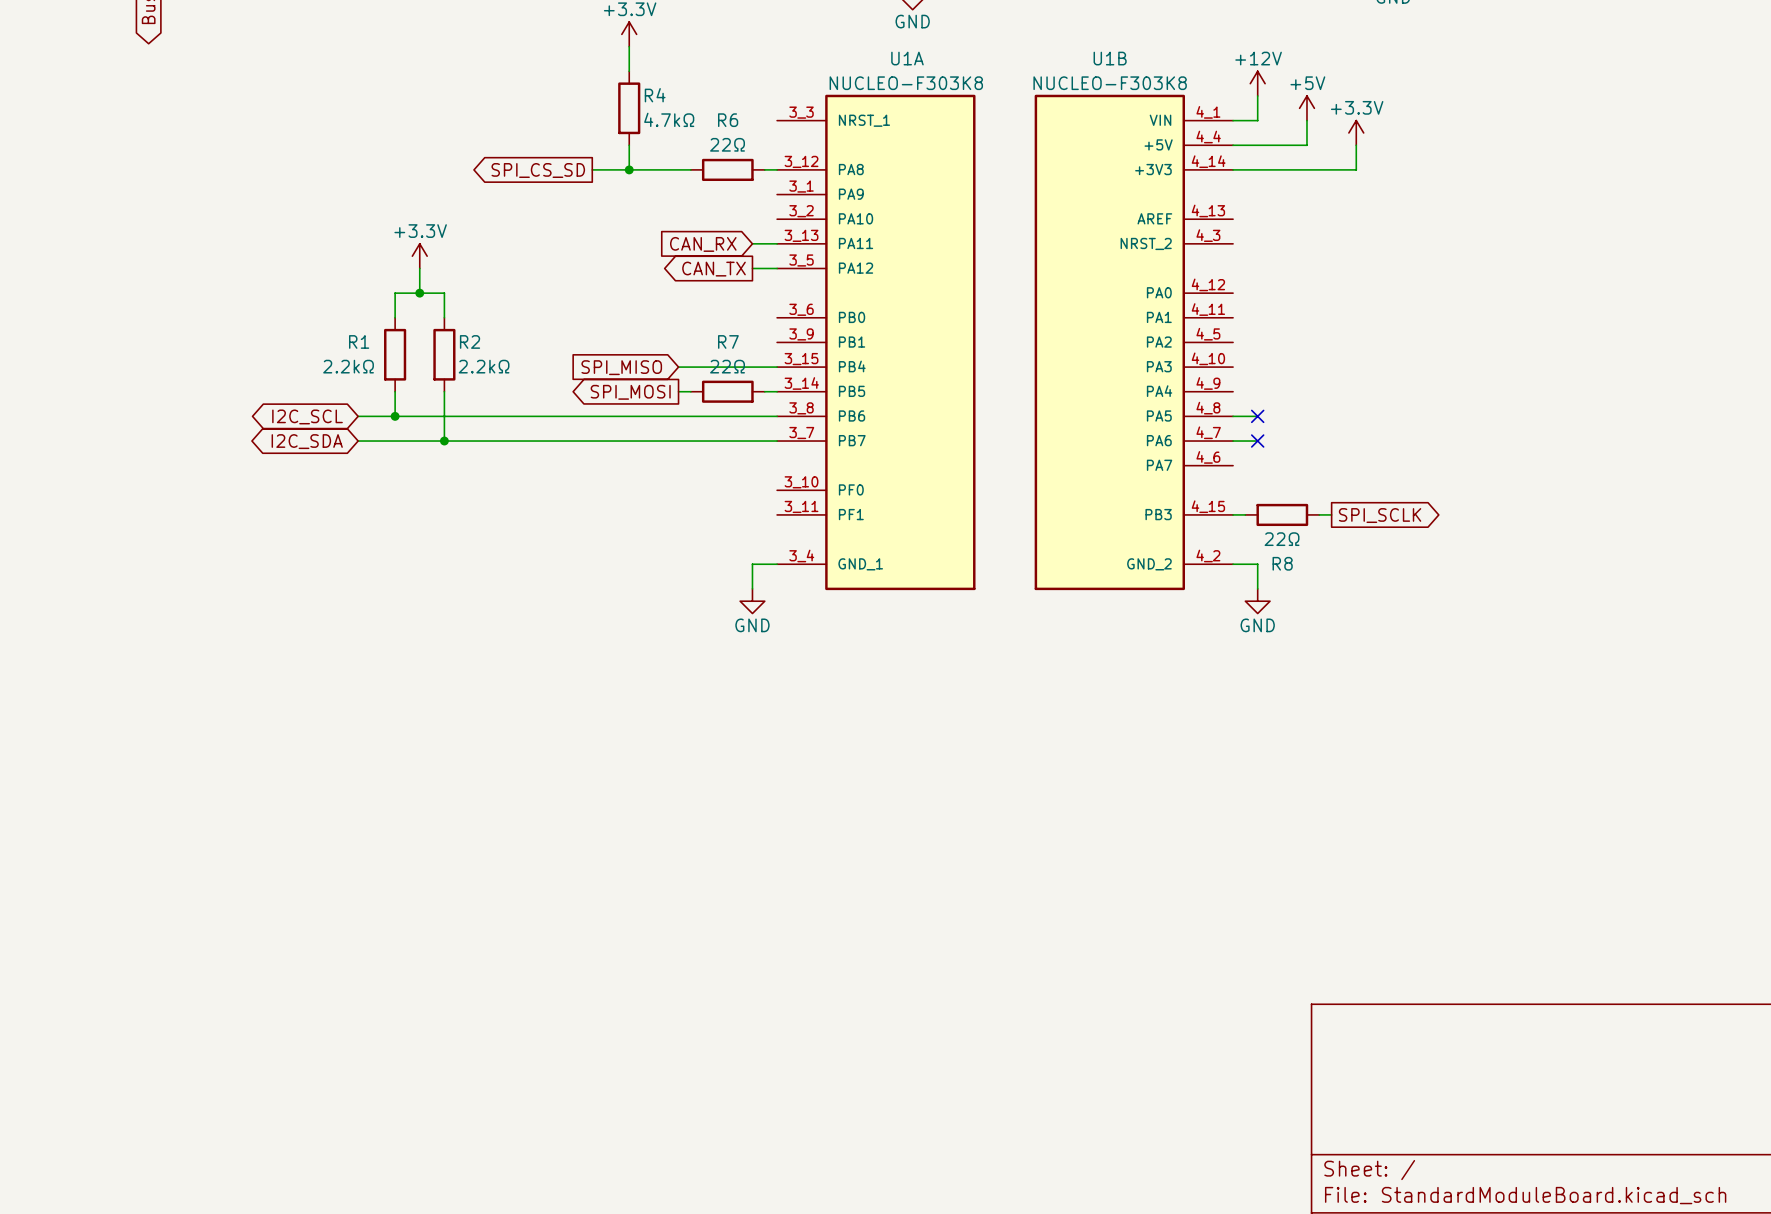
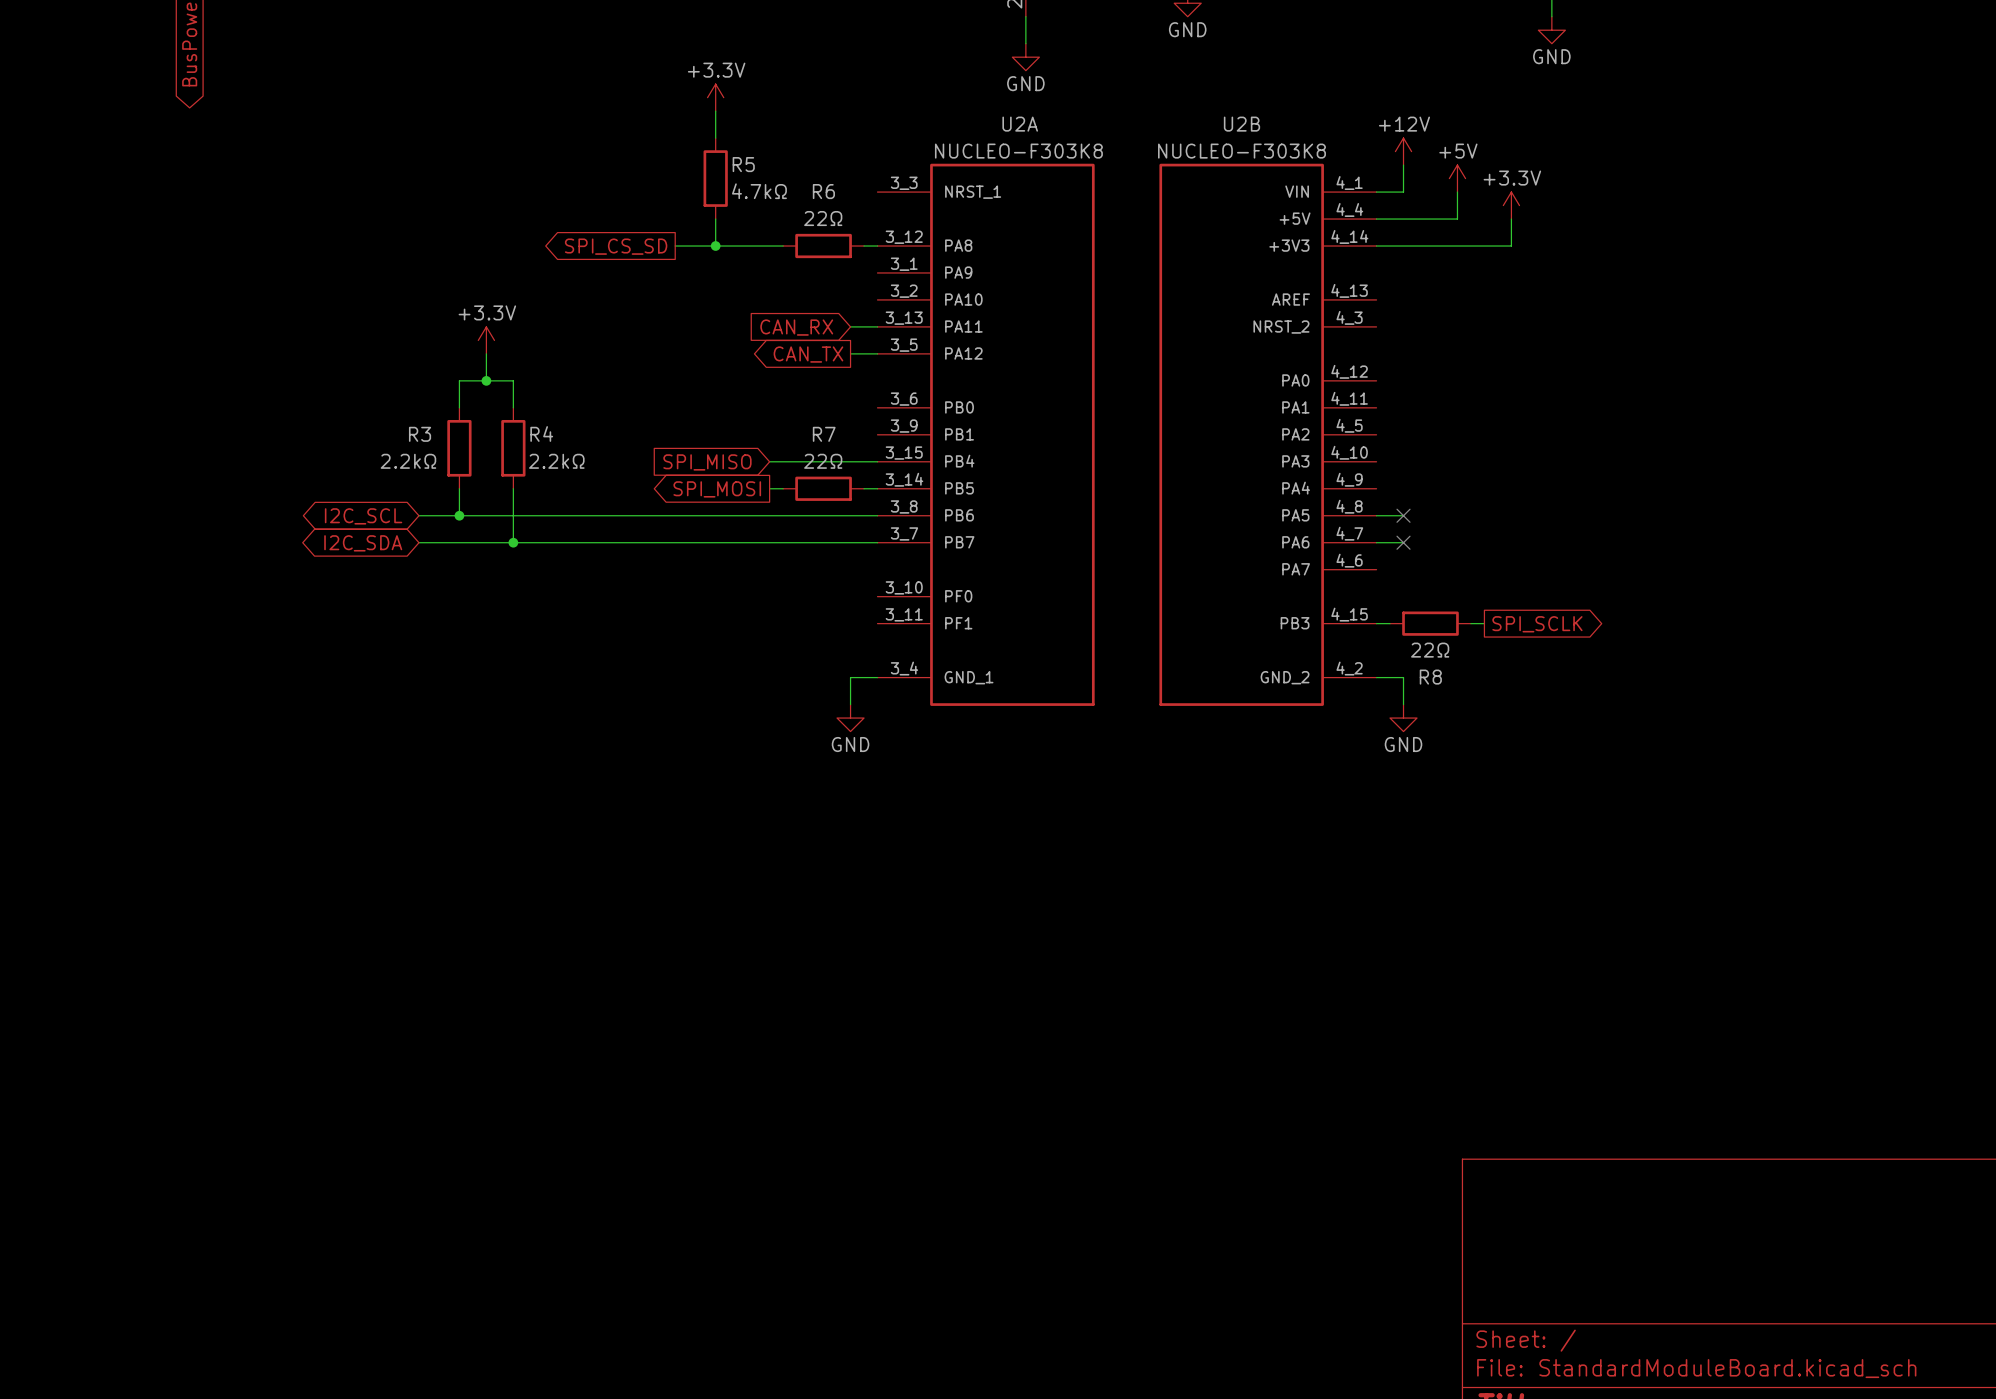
U1A name: U1A (907, 58) -> U2A (1020, 124)
U1B name: U1B (1110, 58) -> U2B (1241, 124)
R4 name: R4 (655, 95) -> R5 (743, 164)
R1 name: R1 (359, 341) -> R3 (420, 434)
R2 name: R2 (470, 341) -> R4 (541, 433)

